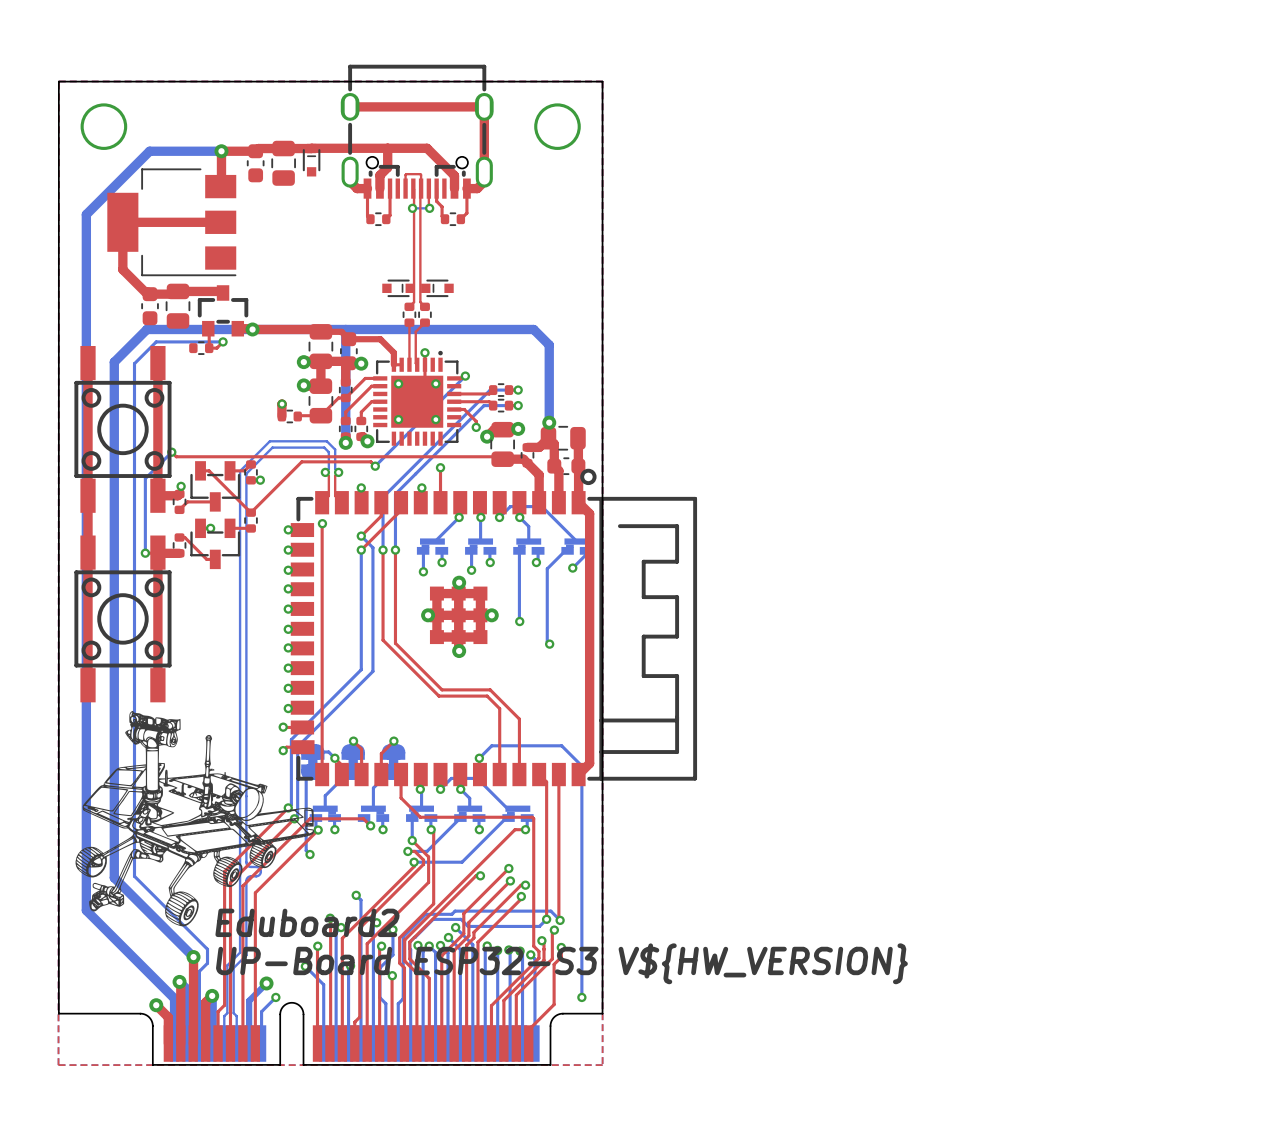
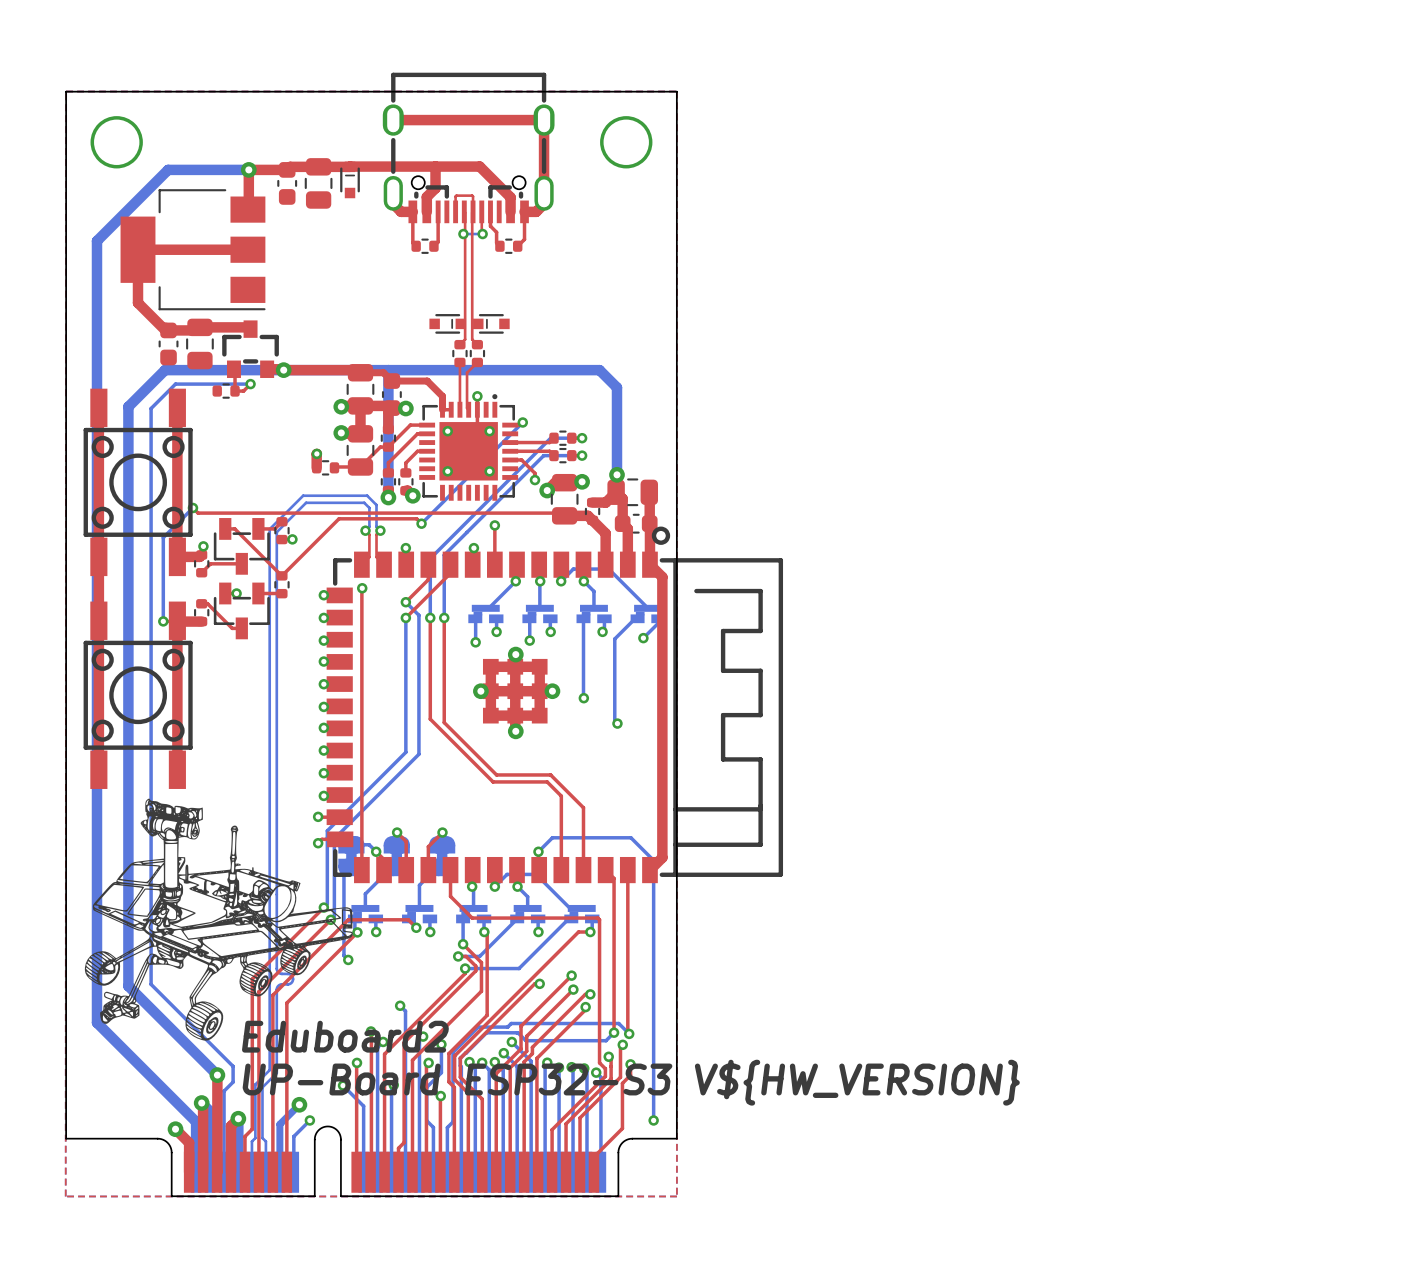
part footprint: [309, 805, 341, 822] -> [347, 904, 384, 924]
part footprint: [357, 805, 390, 822] -> [402, 904, 438, 924]

